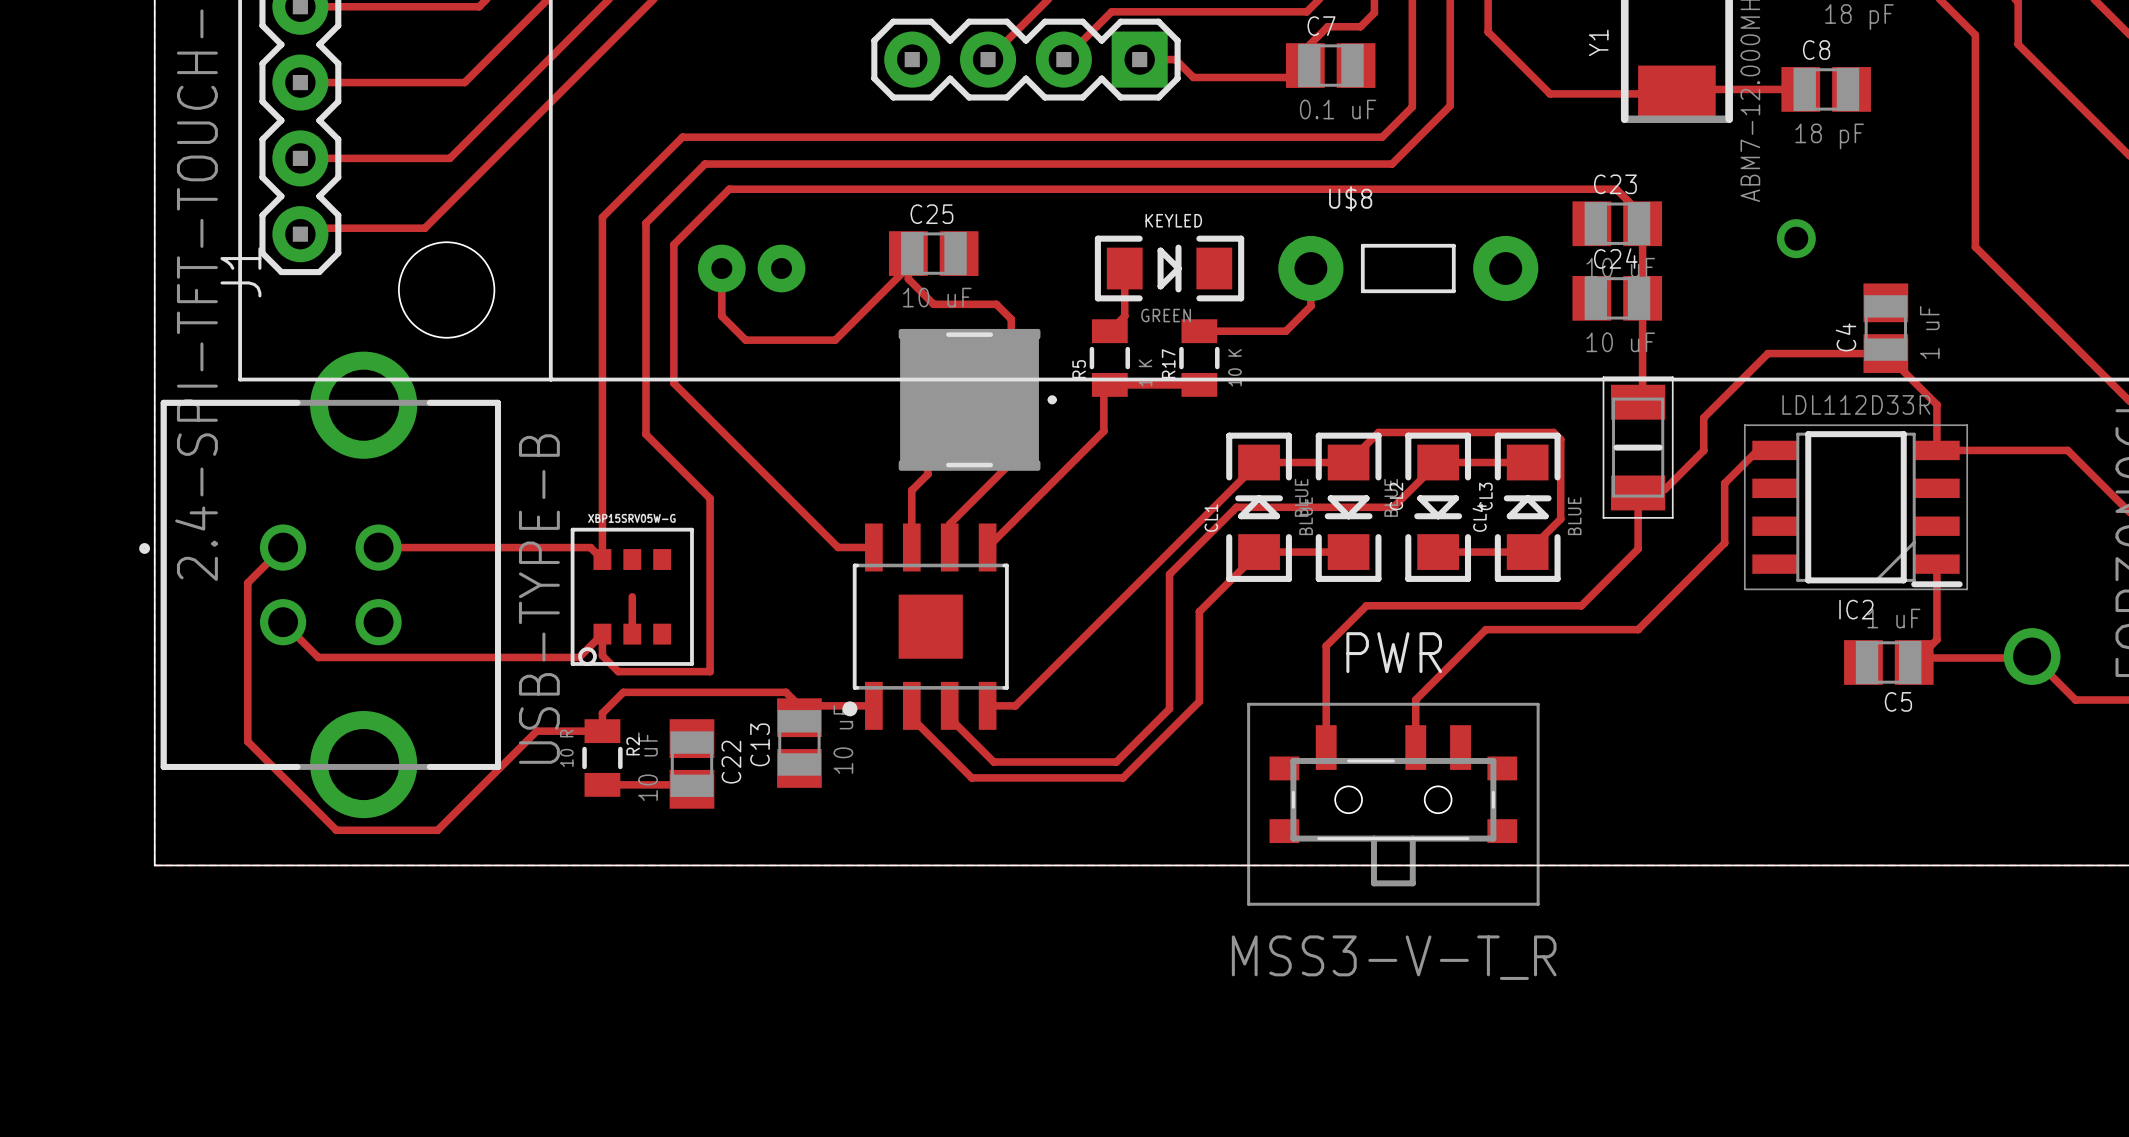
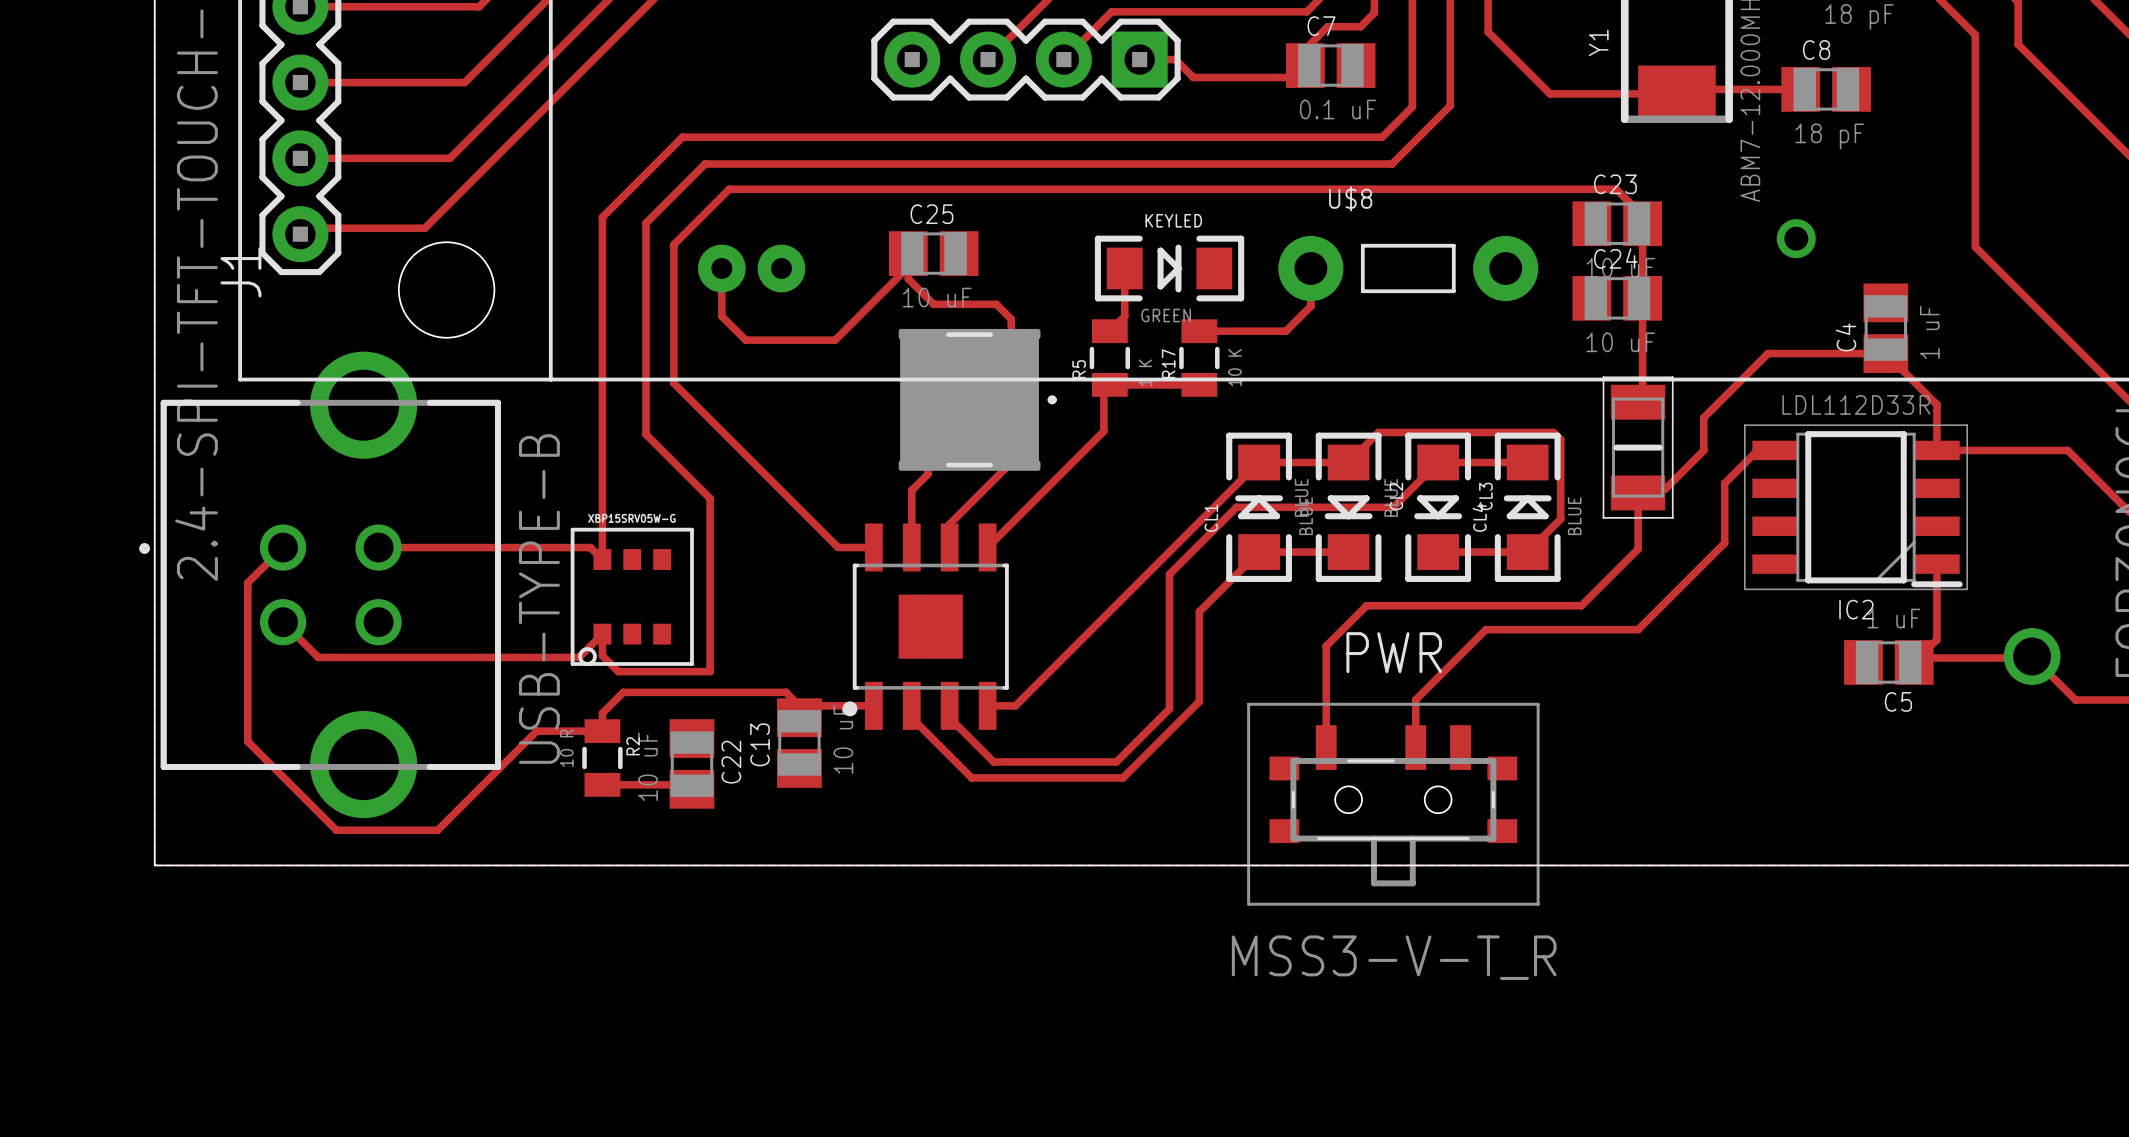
track: (632, 596) (632, 634) -> none

